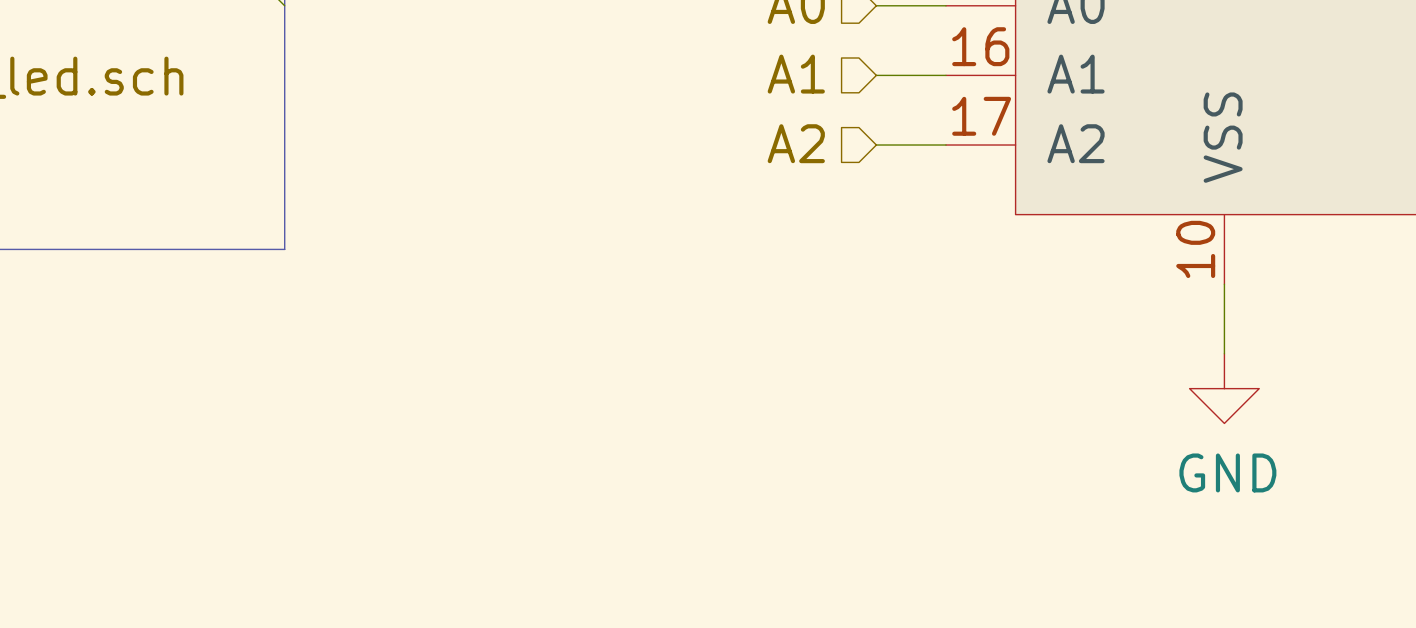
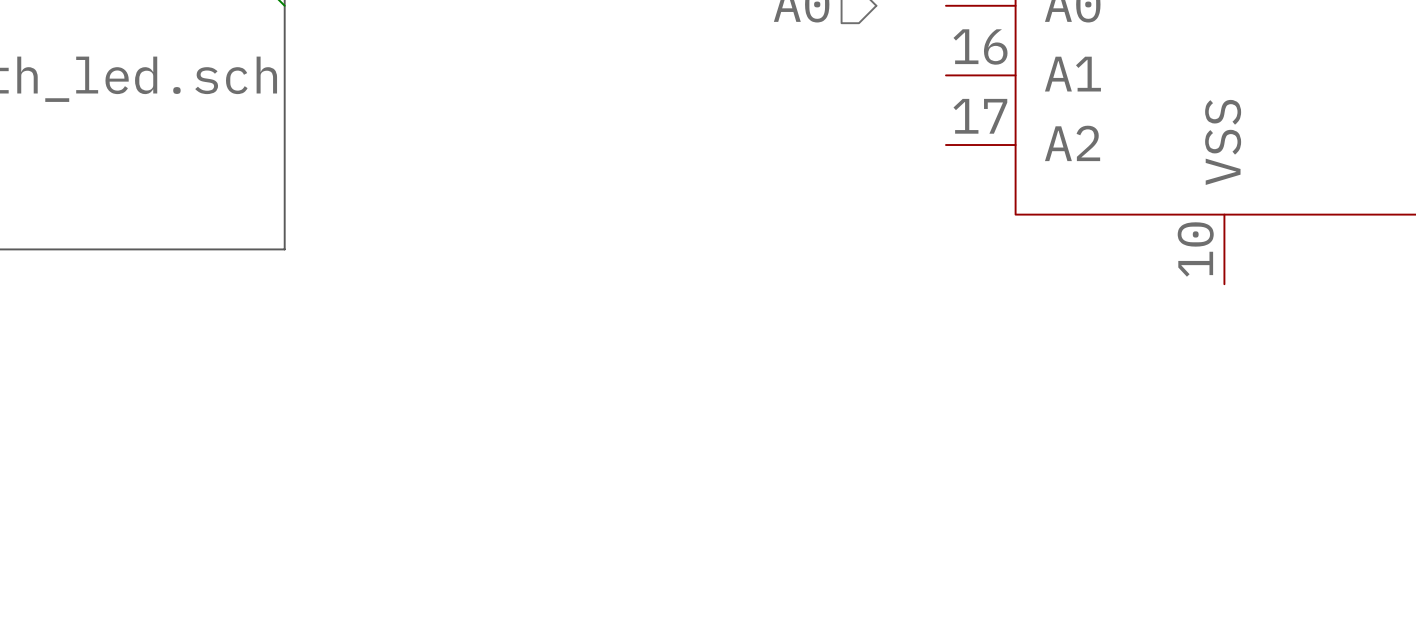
wire: (876, 5) (945, 5) -> none
hierarchical label: A1 (796, 74) -> none
wire: (876, 75) (945, 75) -> none
hierarchical label: A2 (796, 143) -> none
wire: (876, 145) (945, 145) -> none
wire: (1224, 284) (1224, 353) -> none
power symbol: GND (1224, 388) -> none

